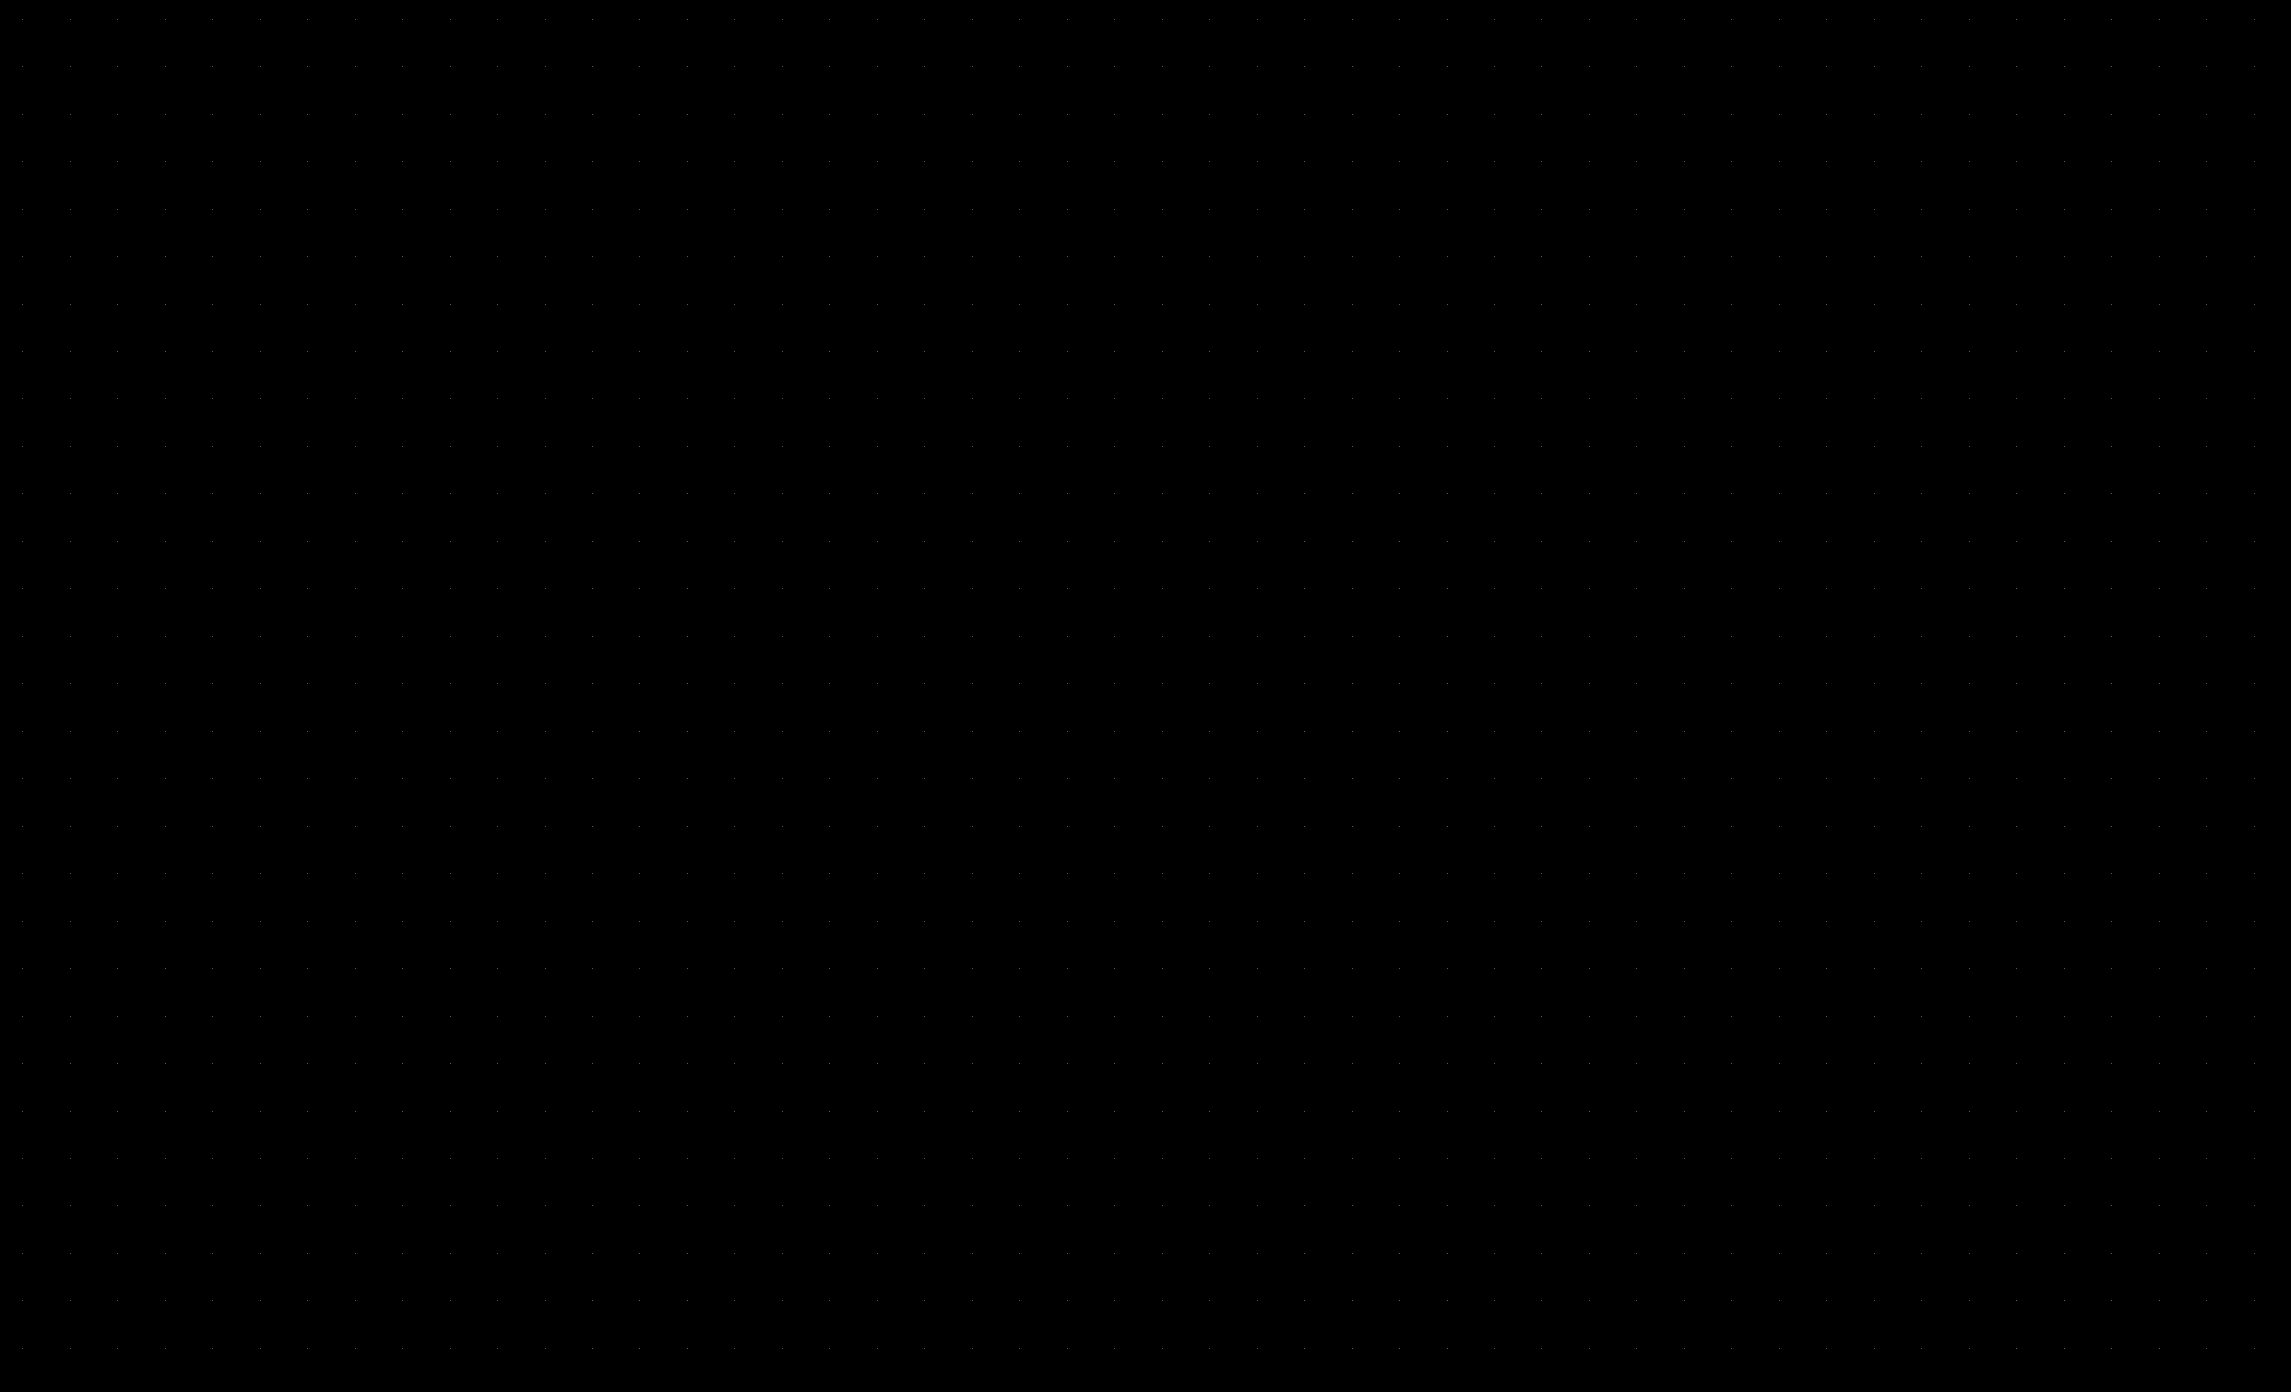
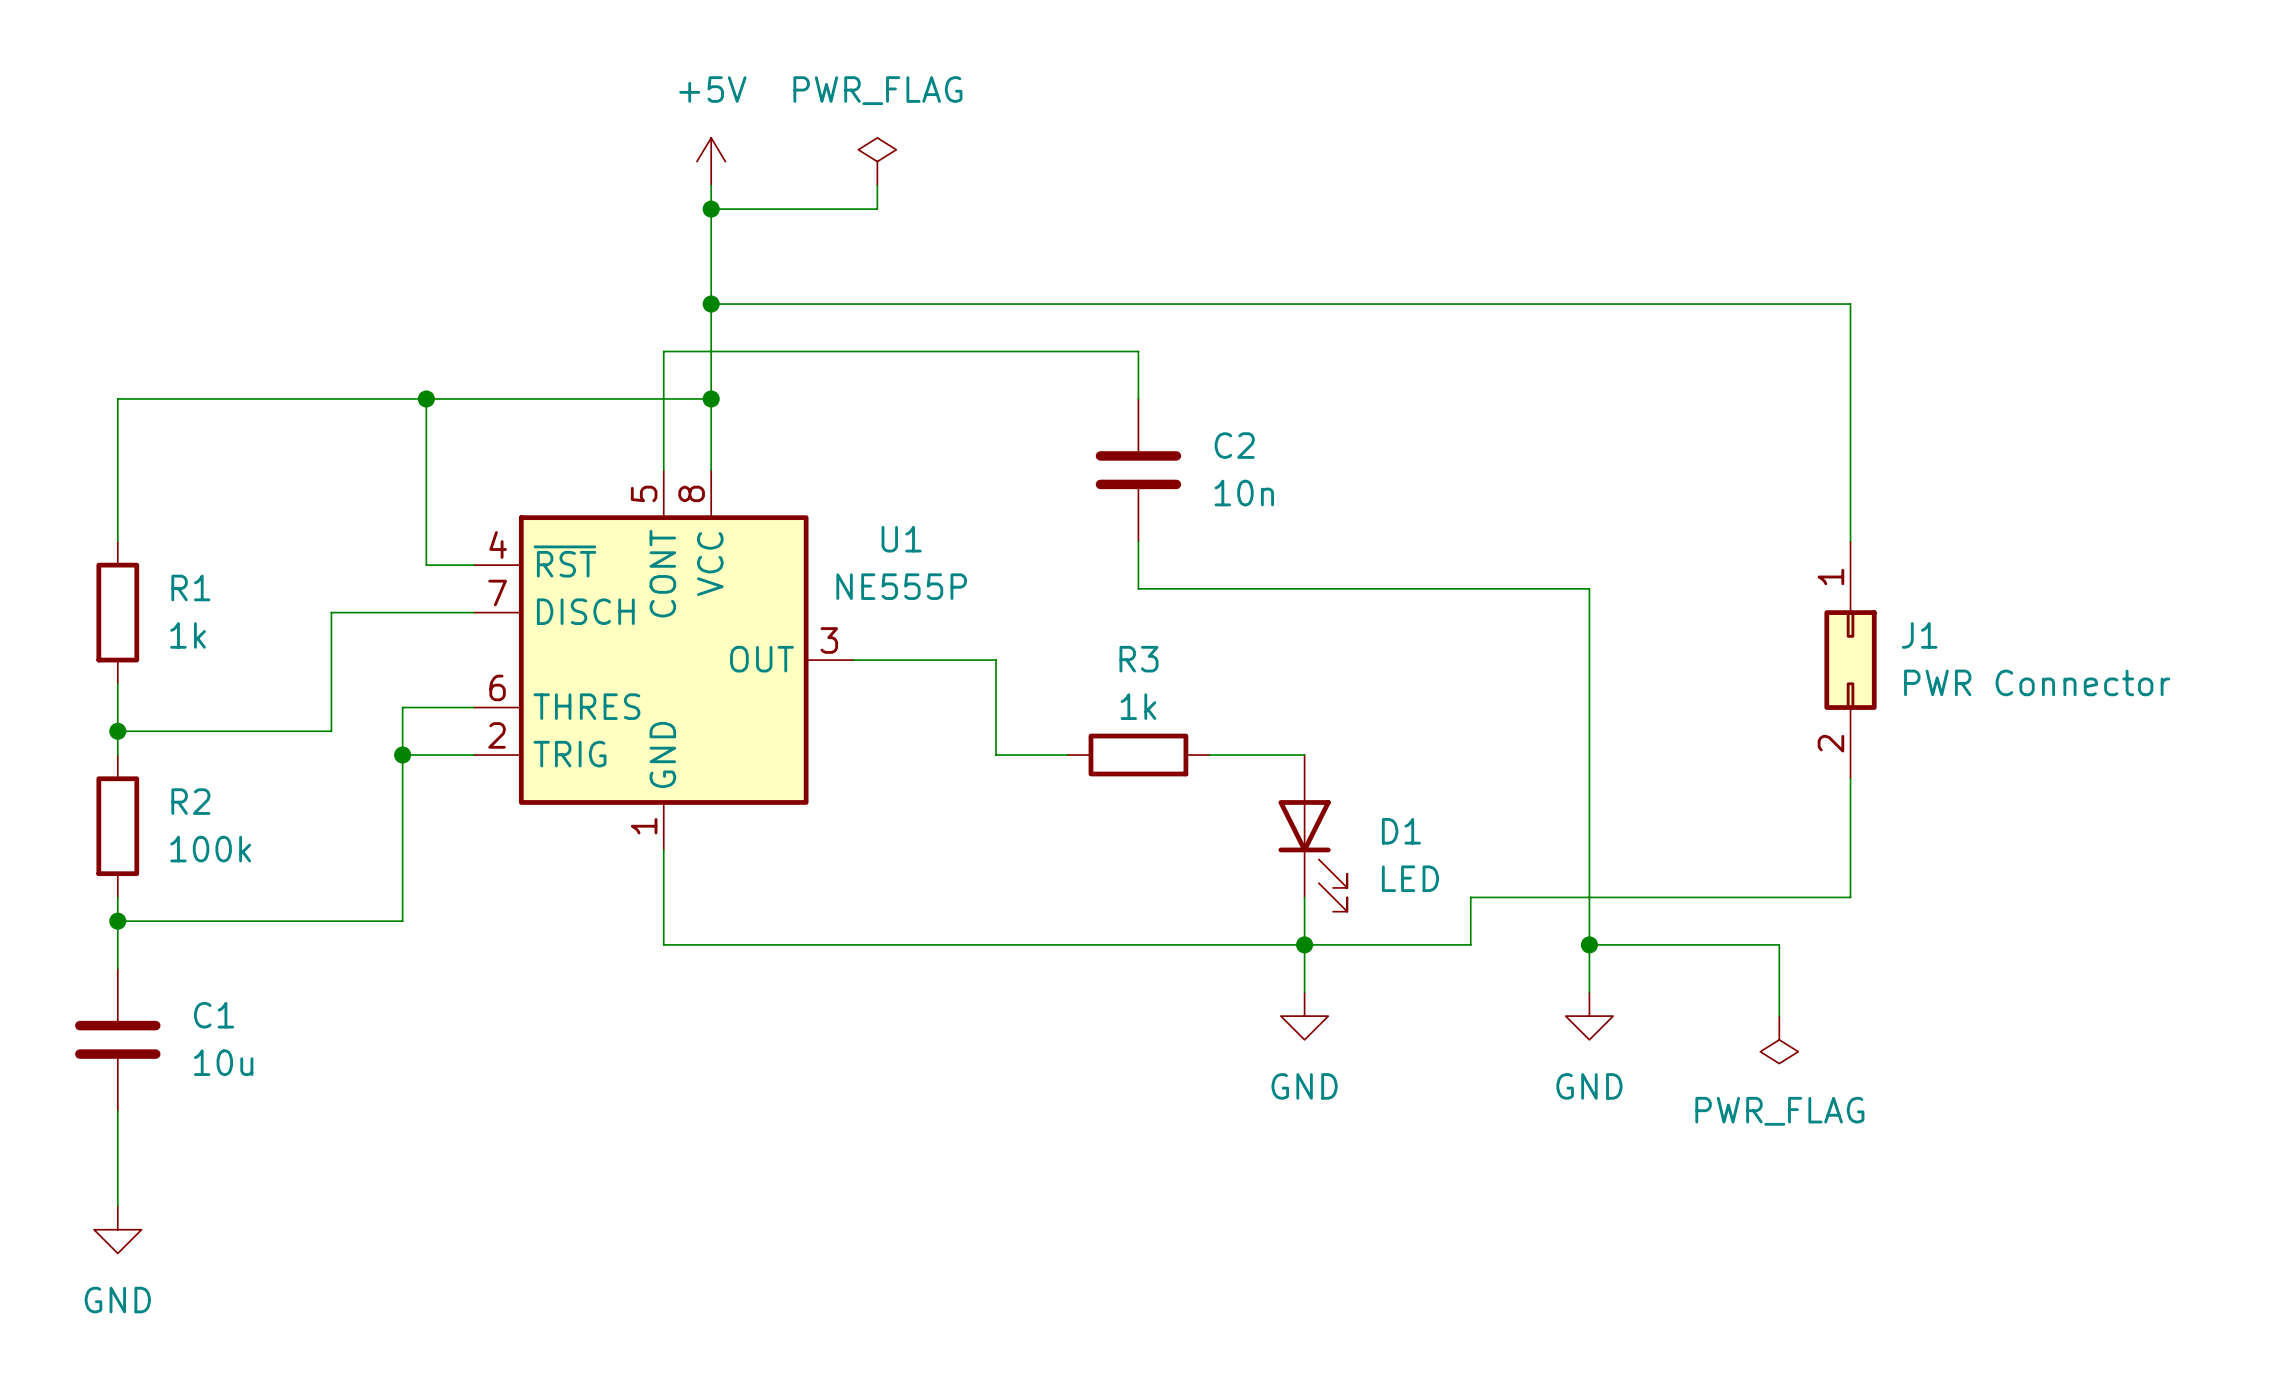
power symbol: none -> +5V (711, 161)
power symbol: none -> PWR_FLAG (877, 161)
wire: none -> (711, 185) (711, 470)
wire: none -> (877, 185) (877, 209) (711, 209)
junction: none -> (711, 209)
wire: none -> (711, 304) (1850, 304) (1850, 541)
junction: none -> (711, 304)
wire: none -> (426, 398) (426, 565) (473, 565)
junction: none -> (426, 398)
wire: none -> (711, 398) (117, 398) (117, 541)
junction: none -> (711, 398)
wire: none -> (1138, 398) (1138, 351) (663, 351) (663, 470)
C2: none -> 10n (1138, 470)
wire: none -> (1138, 541) (1138, 588) (1589, 588) (1589, 992)
R1: none -> 1k (117, 612)
wire: none -> (473, 612) (331, 612) (331, 731) (117, 731)
U1: none -> NE555P (663, 660)
wire: none -> (853, 660) (996, 660) (996, 755) (1067, 755)
J1: none -> PWR Connector (1850, 660)
wire: none -> (117, 683) (117, 755)
wire: none -> (473, 707) (402, 707) (402, 921) (117, 921)
junction: none -> (117, 731)
wire: none -> (402, 755) (473, 755)
junction: none -> (402, 755)
R3: none -> 1k (1138, 755)
wire: none -> (1209, 755) (1304, 755)
wire: none -> (1850, 778) (1850, 897) (1470, 897) (1470, 944) (663, 944) (663, 849)
R2: none -> 100k (117, 826)
D1: none -> LED (1312, 833)
wire: none -> (117, 897) (117, 968)
wire: none -> (1304, 897) (1304, 992)
junction: none -> (117, 921)
junction: none -> (1304, 944)
wire: none -> (1589, 944) (1779, 944) (1779, 1016)
junction: none -> (1589, 944)
power symbol: none -> GND (1304, 1016)
power symbol: none -> GND (1589, 1016)
C1: none -> 10u (117, 1039)
power symbol: none -> PWR_FLAG (1779, 1039)
wire: none -> (117, 1111) (117, 1205)
power symbol: none -> GND (117, 1229)

